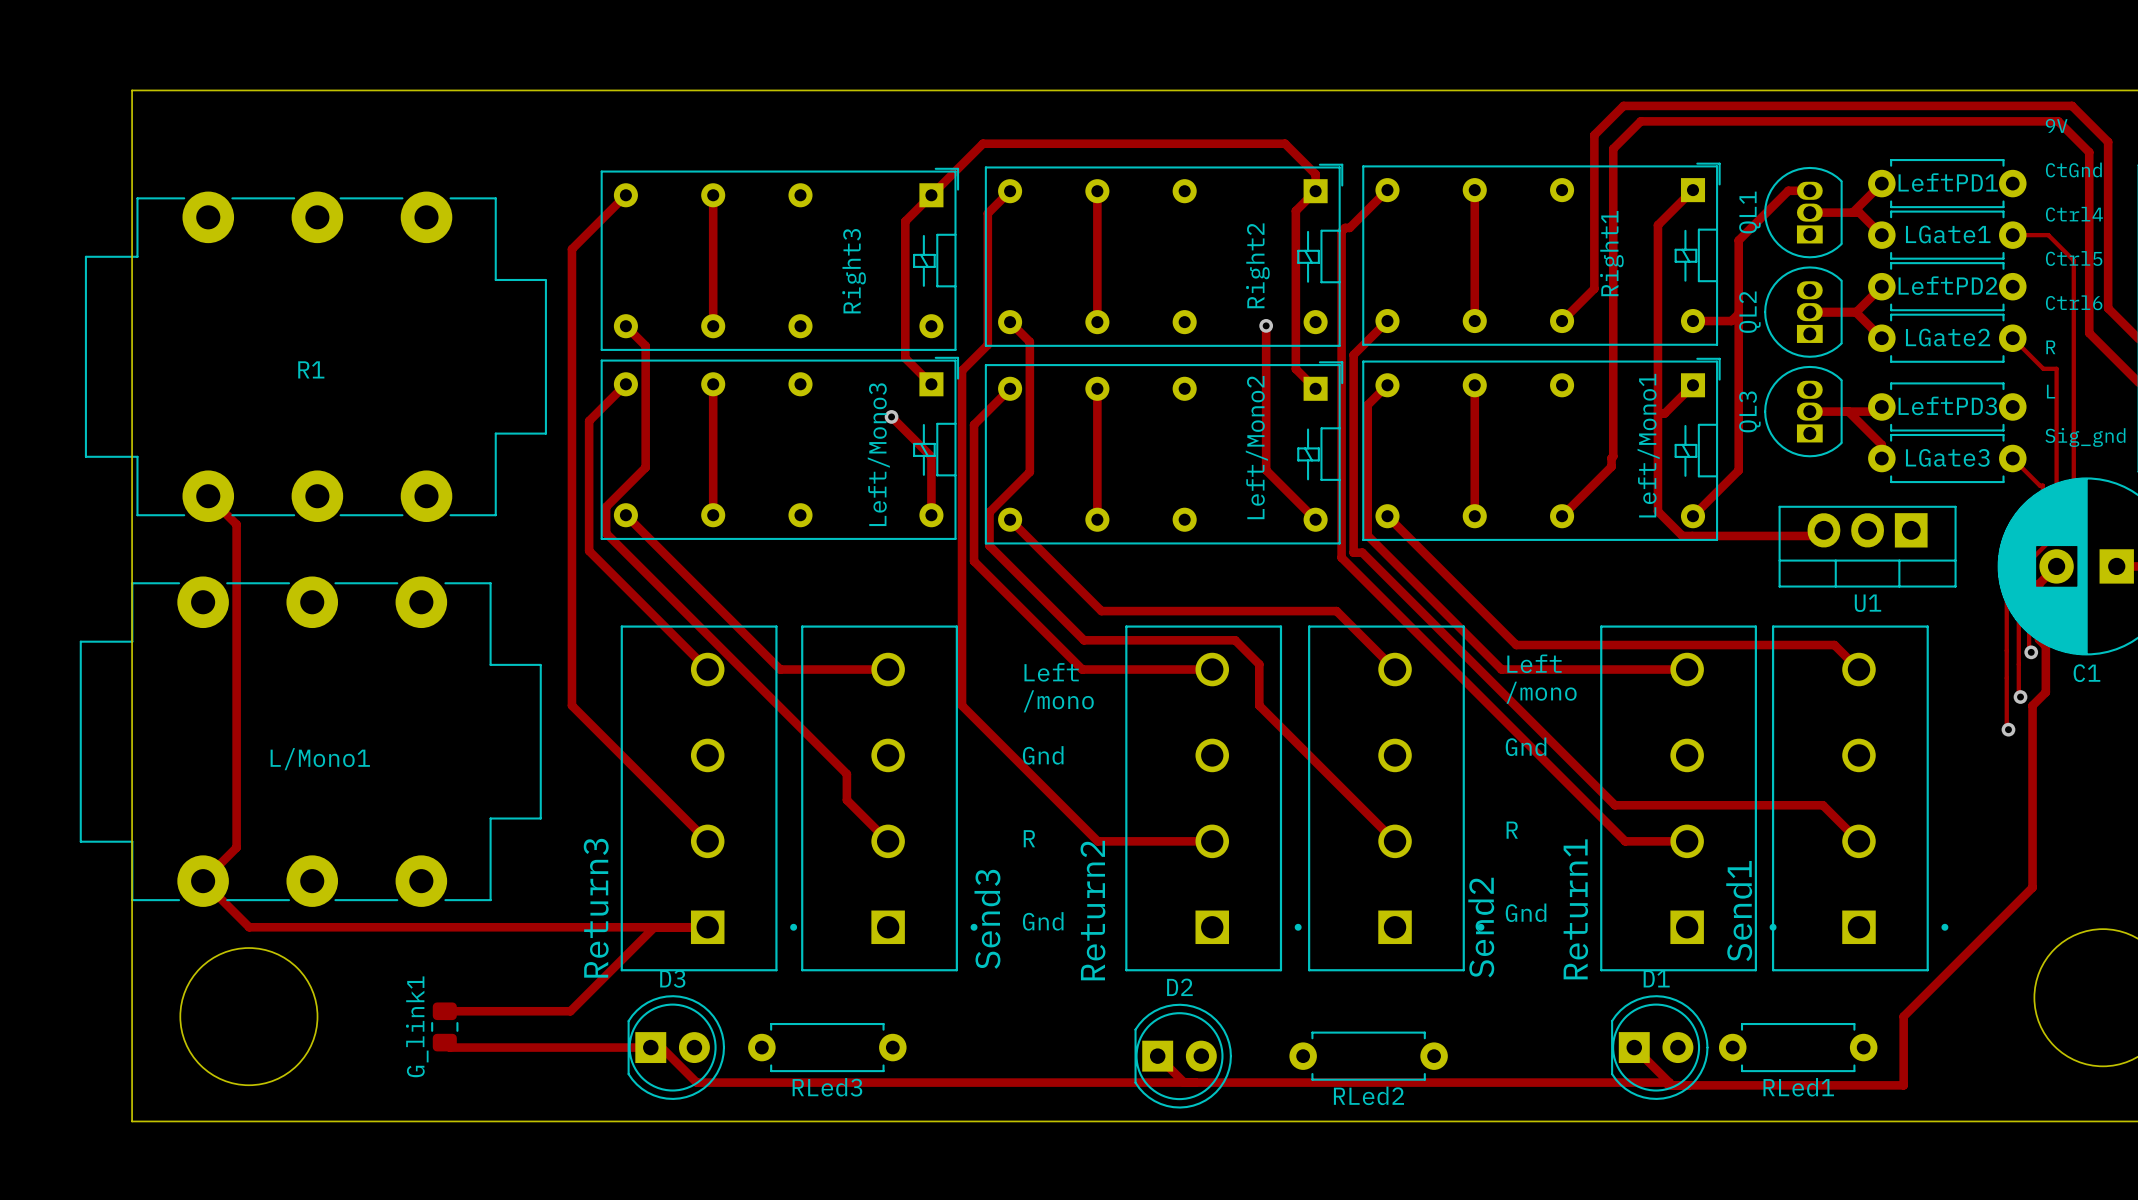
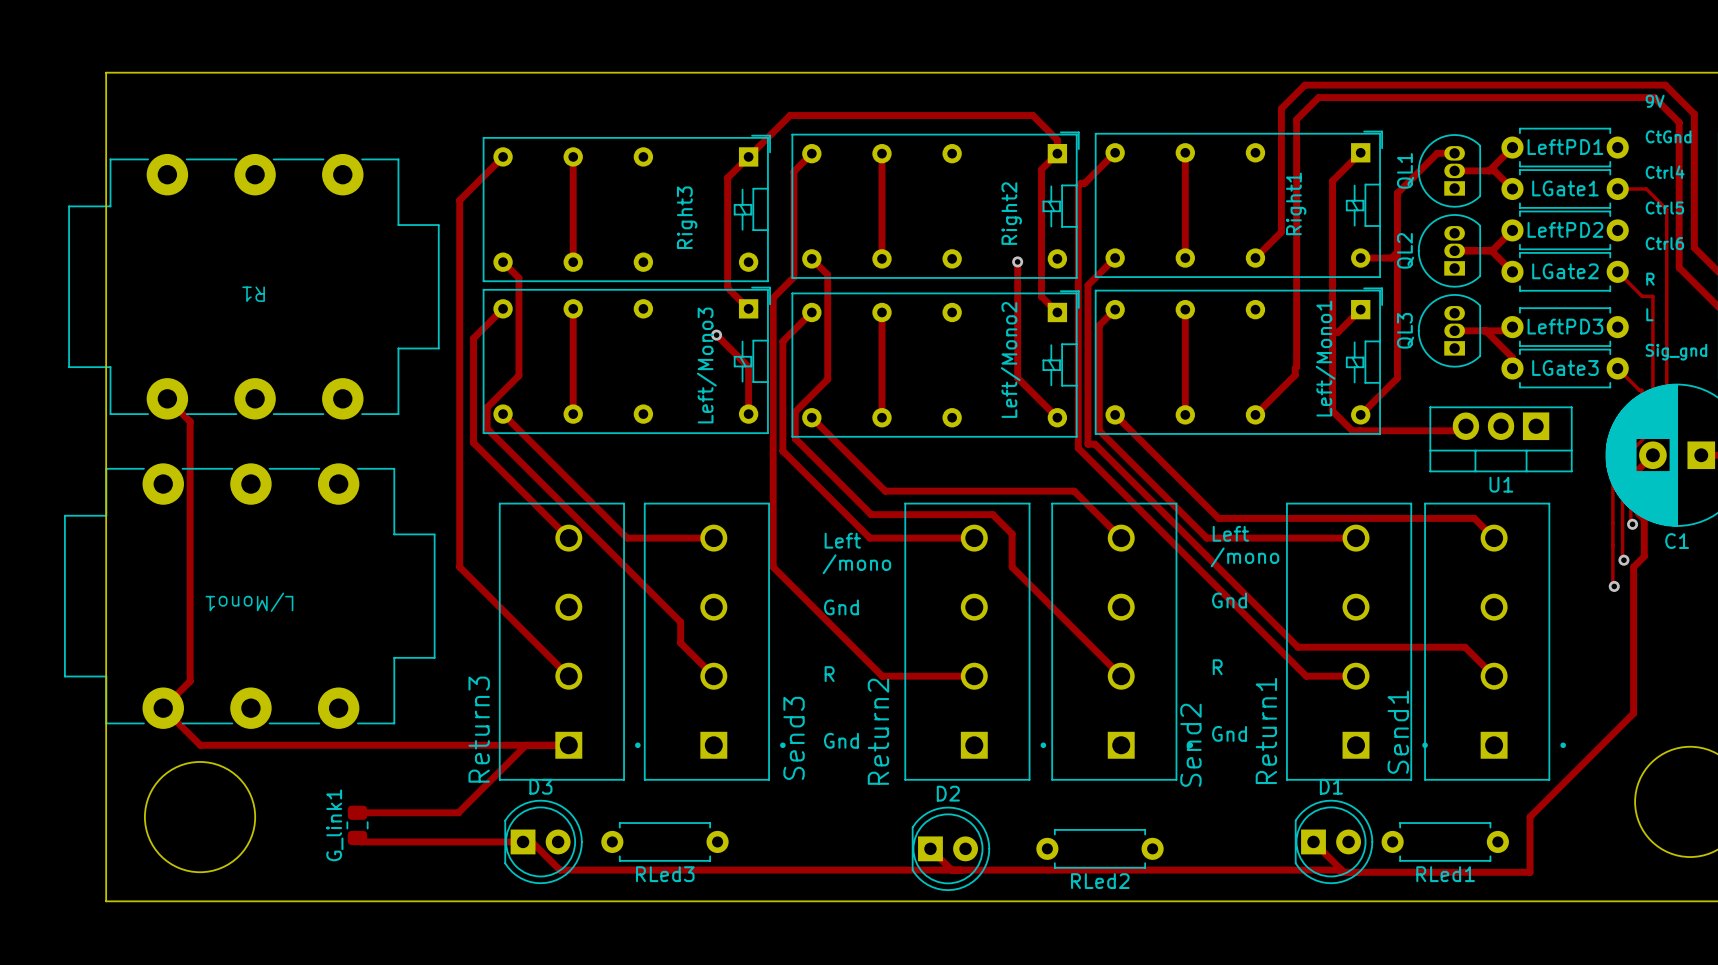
R1 name rotation: 0° (311, 369) -> 180° (253, 294)
L/Mono1 name rotation: 0° (320, 759) -> 180° (249, 602)

